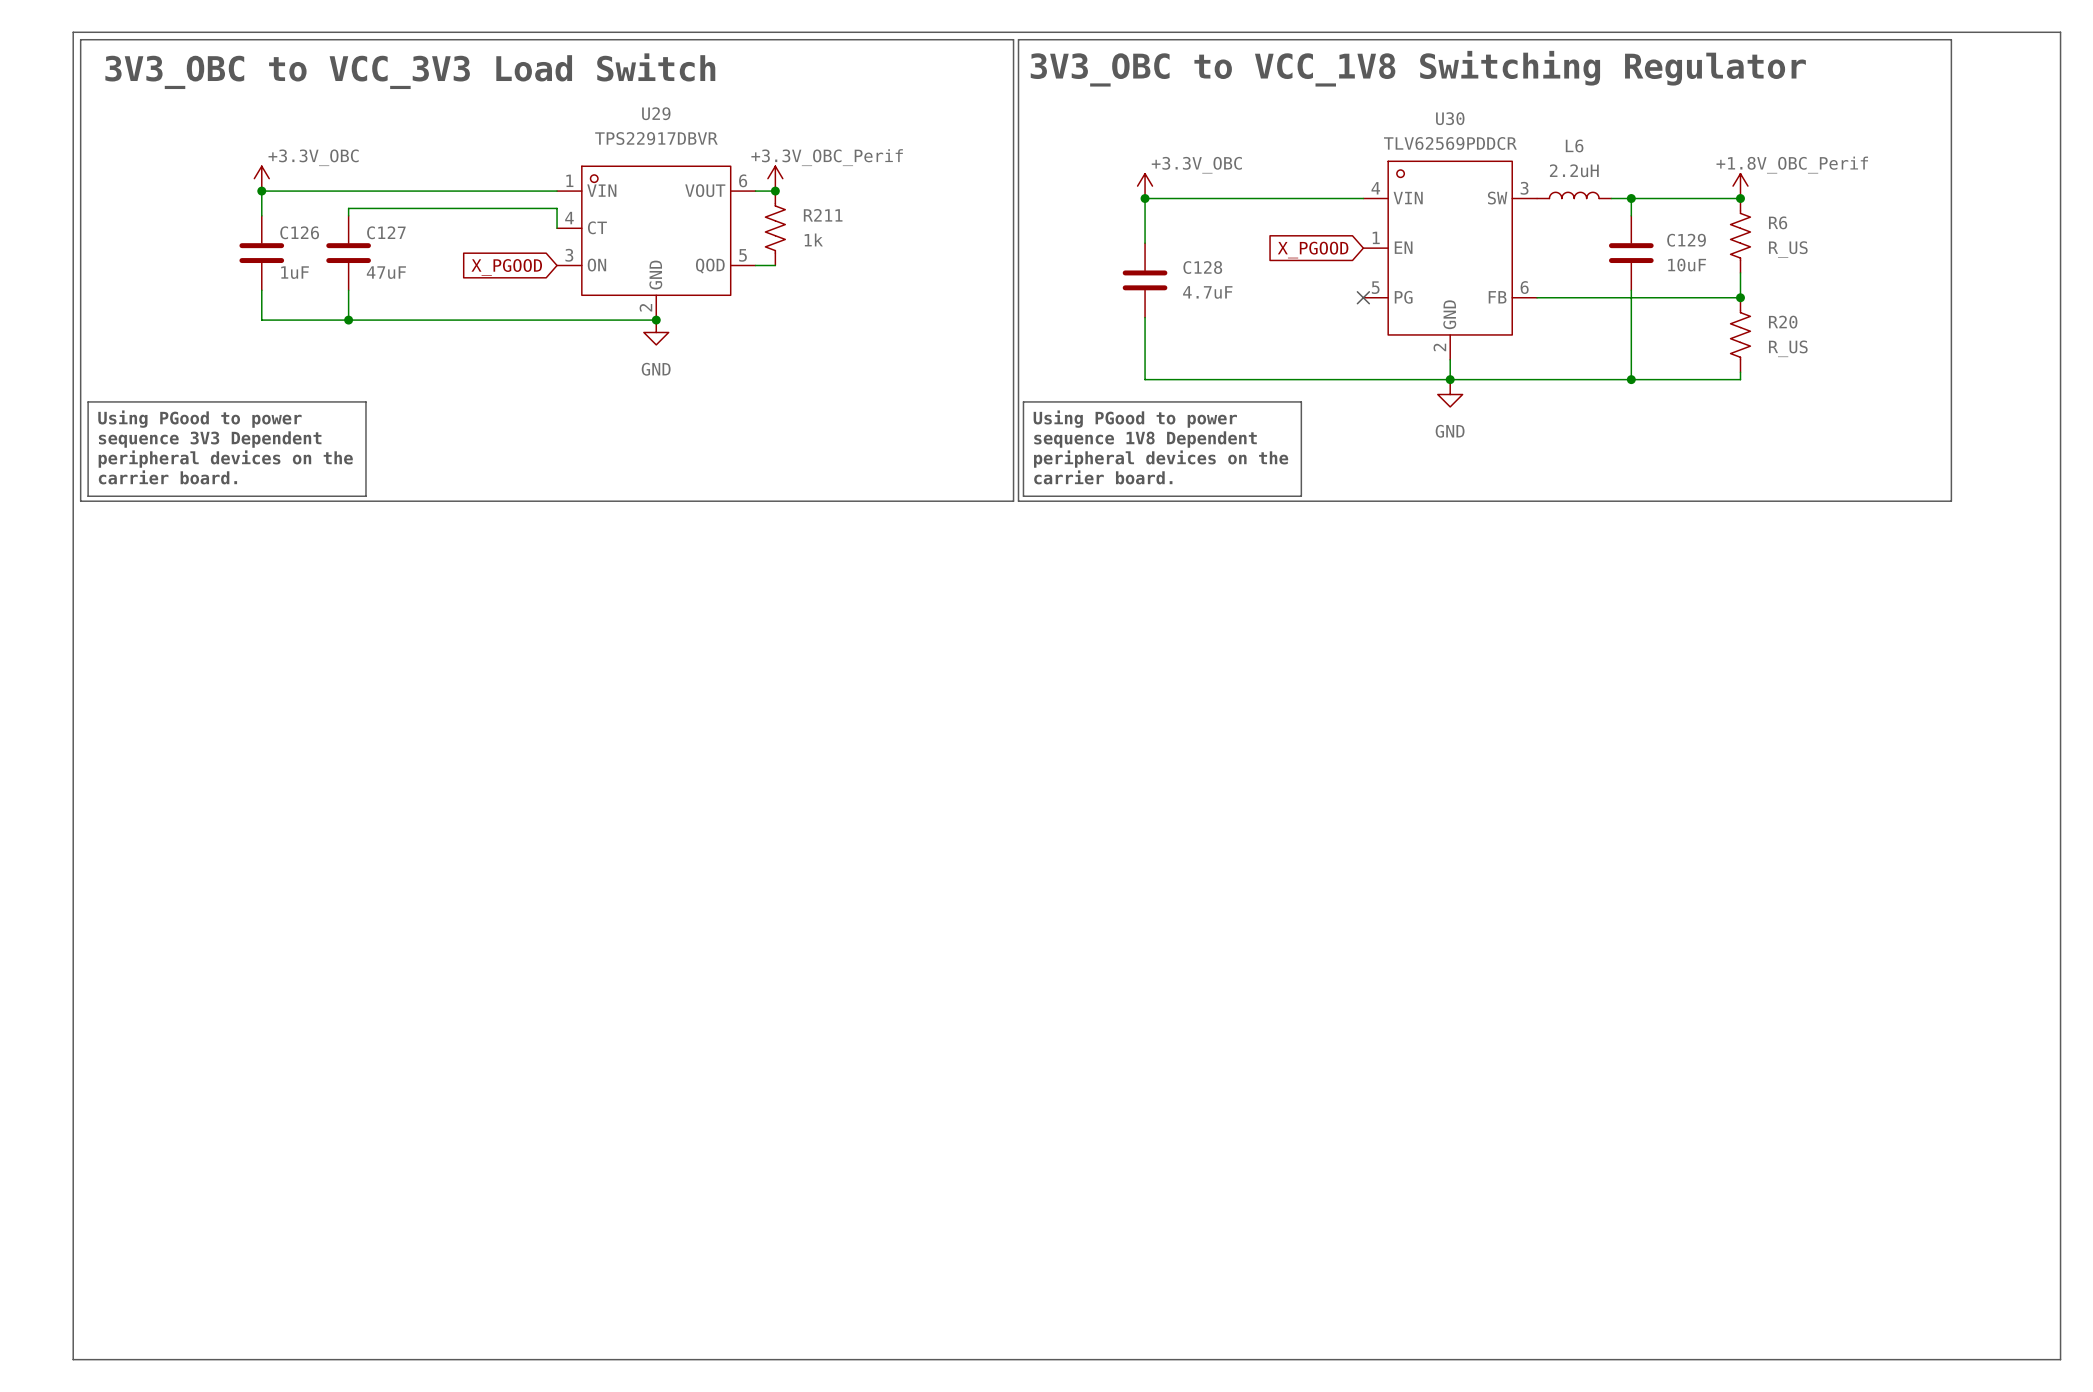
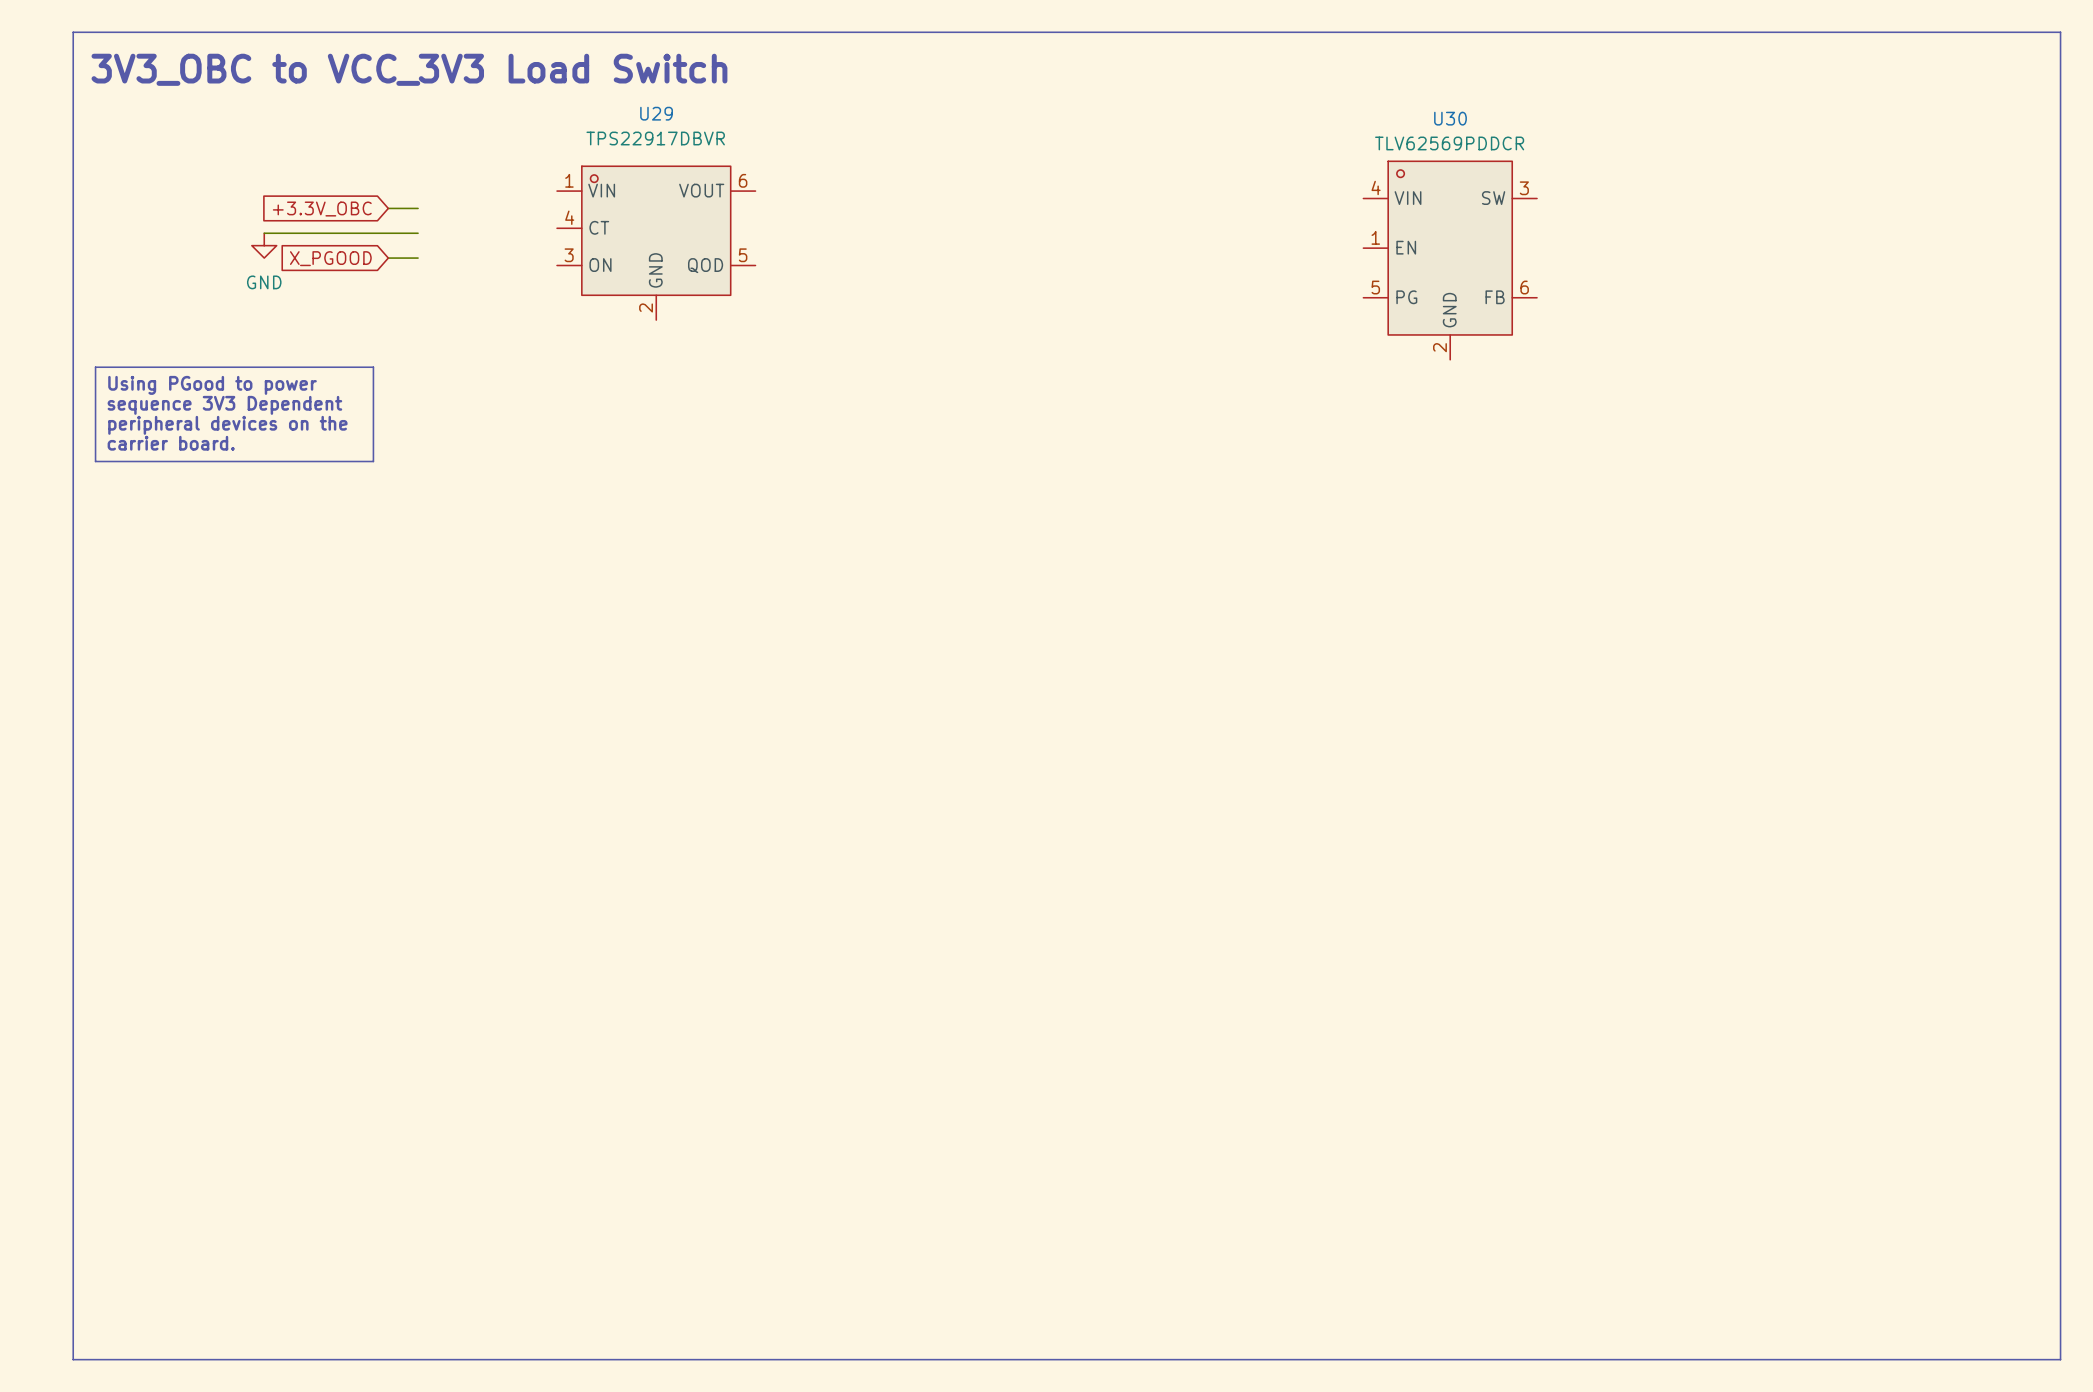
line: (80, 39) (1013, 39) (1013, 501) (80, 501) (80, 39) -> none
line: (1018, 39) (1951, 39) (1951, 501) (1018, 501) (1018, 39) -> none
text: 3V3_OBC to VCC_1V8 Switching Regulator (1418, 68) -> none
power symbol: +3.3V_OBC (261, 178) -> none
power symbol: +3.3V_OBC_Perif (775, 178) -> none
power symbol: +3.3V_OBC (1145, 186) -> none
power symbol: +1.8V_OBC_Perif (1740, 186) -> none
junction: (261, 191) -> none
wire: (557, 191) (261, 191) (261, 215) -> none
wire: (755, 191) (775, 191) -> none
junction: (775, 191) -> none
L6: 2.2uH (1574, 195) -> none
junction: (1145, 198) -> none
wire: (1363, 198) (1145, 198) (1145, 243) -> none
wire: (1611, 198) (1740, 198) -> none
wire: (1631, 198) (1631, 215) -> none
junction: (1631, 198) -> none
junction: (1740, 198) -> none
wire: (388, 208) (348, 208) (348, 215) -> none
wire: (418, 208) (557, 208) (557, 228) -> none
global label: none -> +3.3V_OBC (322, 209)
R211: 1k (775, 228) -> none
wire: none -> (264, 233) (418, 233)
R6: R_US (1740, 235) -> none
power symbol: none -> GND (264, 245)
global label: X_PGOOD (1313, 250) -> none
C126: 1uF (261, 253) -> none
C127: 47uF (348, 253) -> none
C129: 10uF (1631, 253) -> none
wire: none -> (388, 258) (418, 258)
wire: (755, 265) (775, 265) -> none
global label position: X_PGOOD (506, 267) -> X_PGOOD (330, 258)
wire: (1740, 272) (1740, 297) (1537, 297) -> none
C128: 4.7uF (1145, 280) -> none
wire: (261, 290) (261, 320) (656, 320) -> none
wire: (348, 290) (348, 320) -> none
wire: (1631, 290) (1631, 379) -> none
no-connect mark: (1363, 297) -> none
junction: (1740, 297) -> none
wire: (1145, 317) (1145, 379) (1450, 379) -> none
junction: (348, 320) -> none
junction: (656, 320) -> none
power symbol: GND (656, 332) -> none
R20: R_US (1740, 334) -> none
wire: (1450, 359) (1450, 382) -> none
wire: (1740, 372) (1740, 379) (1452, 379) -> none
junction: (1450, 379) -> none
junction: (1631, 379) -> none
power symbol: GND (1450, 394) -> none
line: (88, 401) (365, 401) (365, 496) (88, 496) (88, 401) -> (95, 367) (373, 367) (373, 461) (95, 461) (95, 367)
line: (1023, 401) (1301, 401) (1301, 496) (1023, 496) (1023, 401) -> none
text position: Using PGood to power (199, 419) -> Using PGood to power (212, 385)
text: Using PGood to power (1135, 419) -> none
text position: sequence 3V3 Dependent (210, 439) -> sequence 3V3 Dependent (224, 405)
text: sequence 1V8 Dependent (1145, 439) -> none
text position: peripheral devices on the (225, 459) -> peripheral devices on the (227, 425)
text: peripheral devices on the (1161, 459) -> none
text position: carrier board. (167, 477) -> carrier board. (171, 443)
text: carrier board. (1103, 477) -> none

